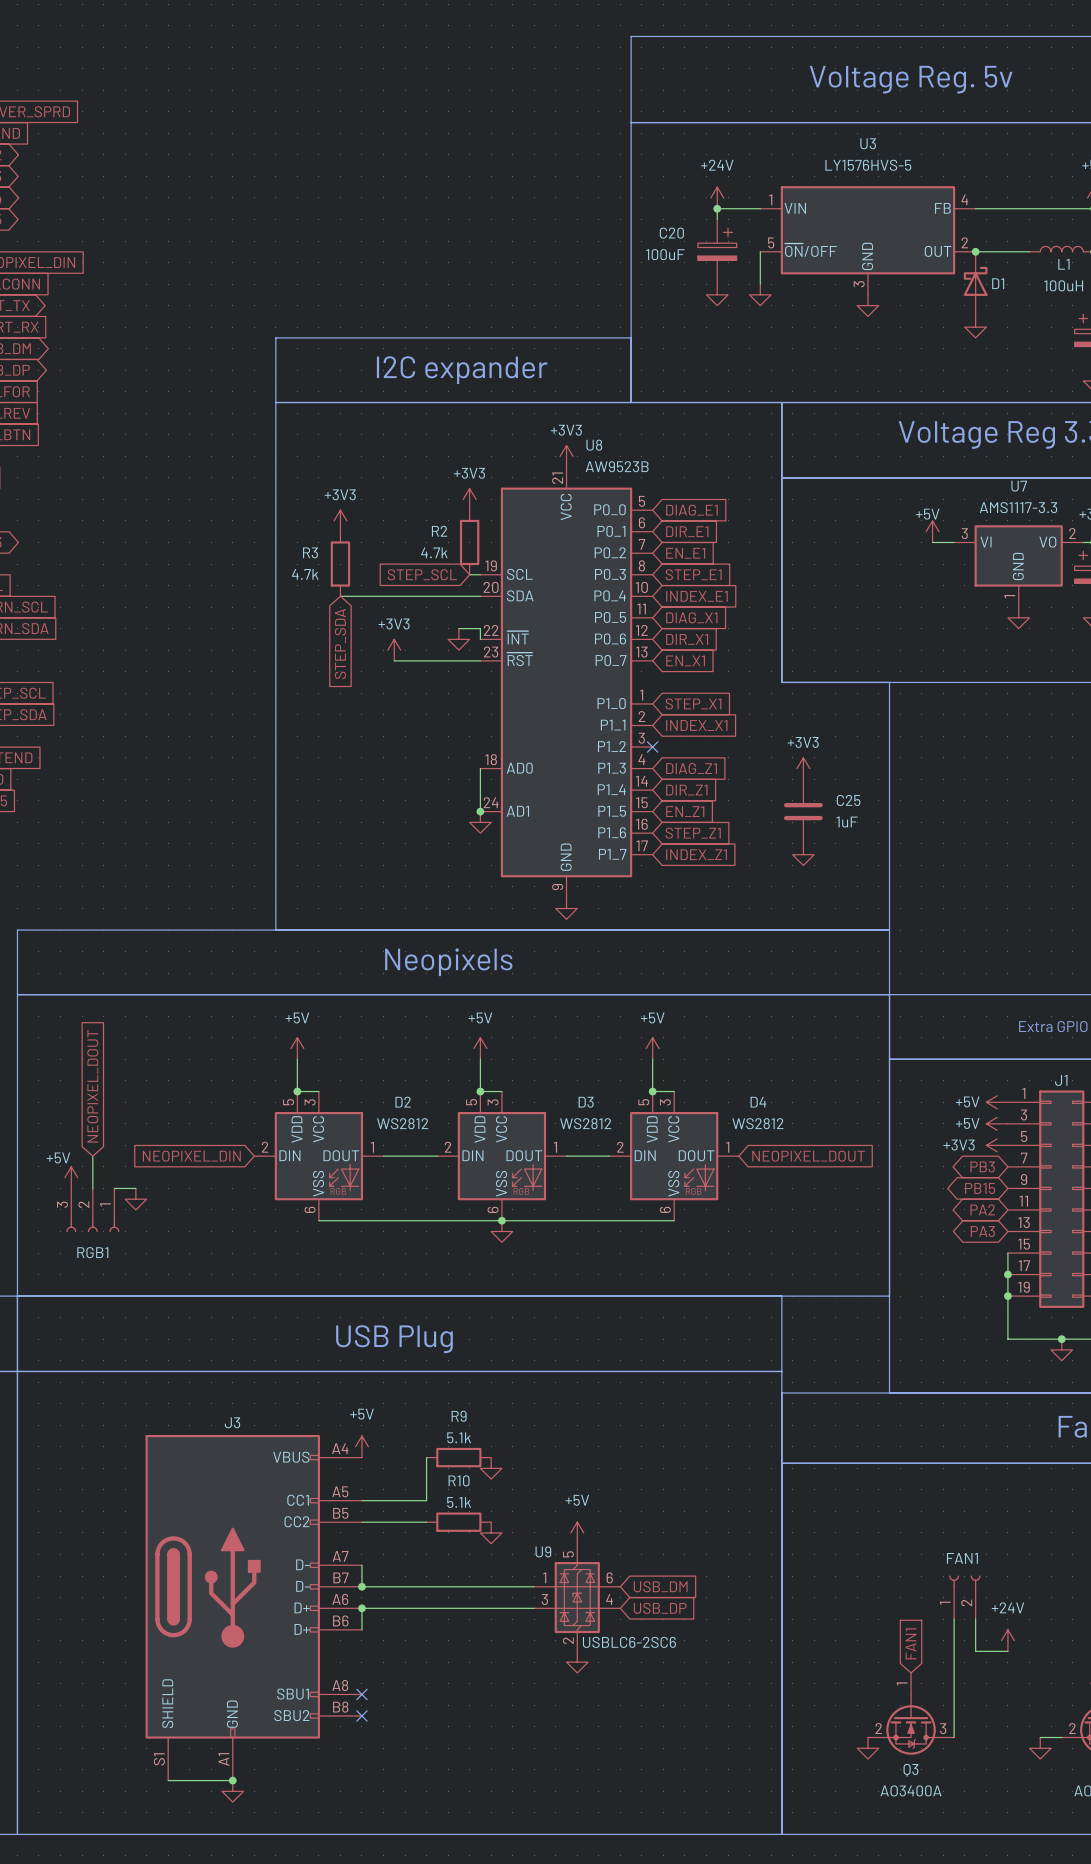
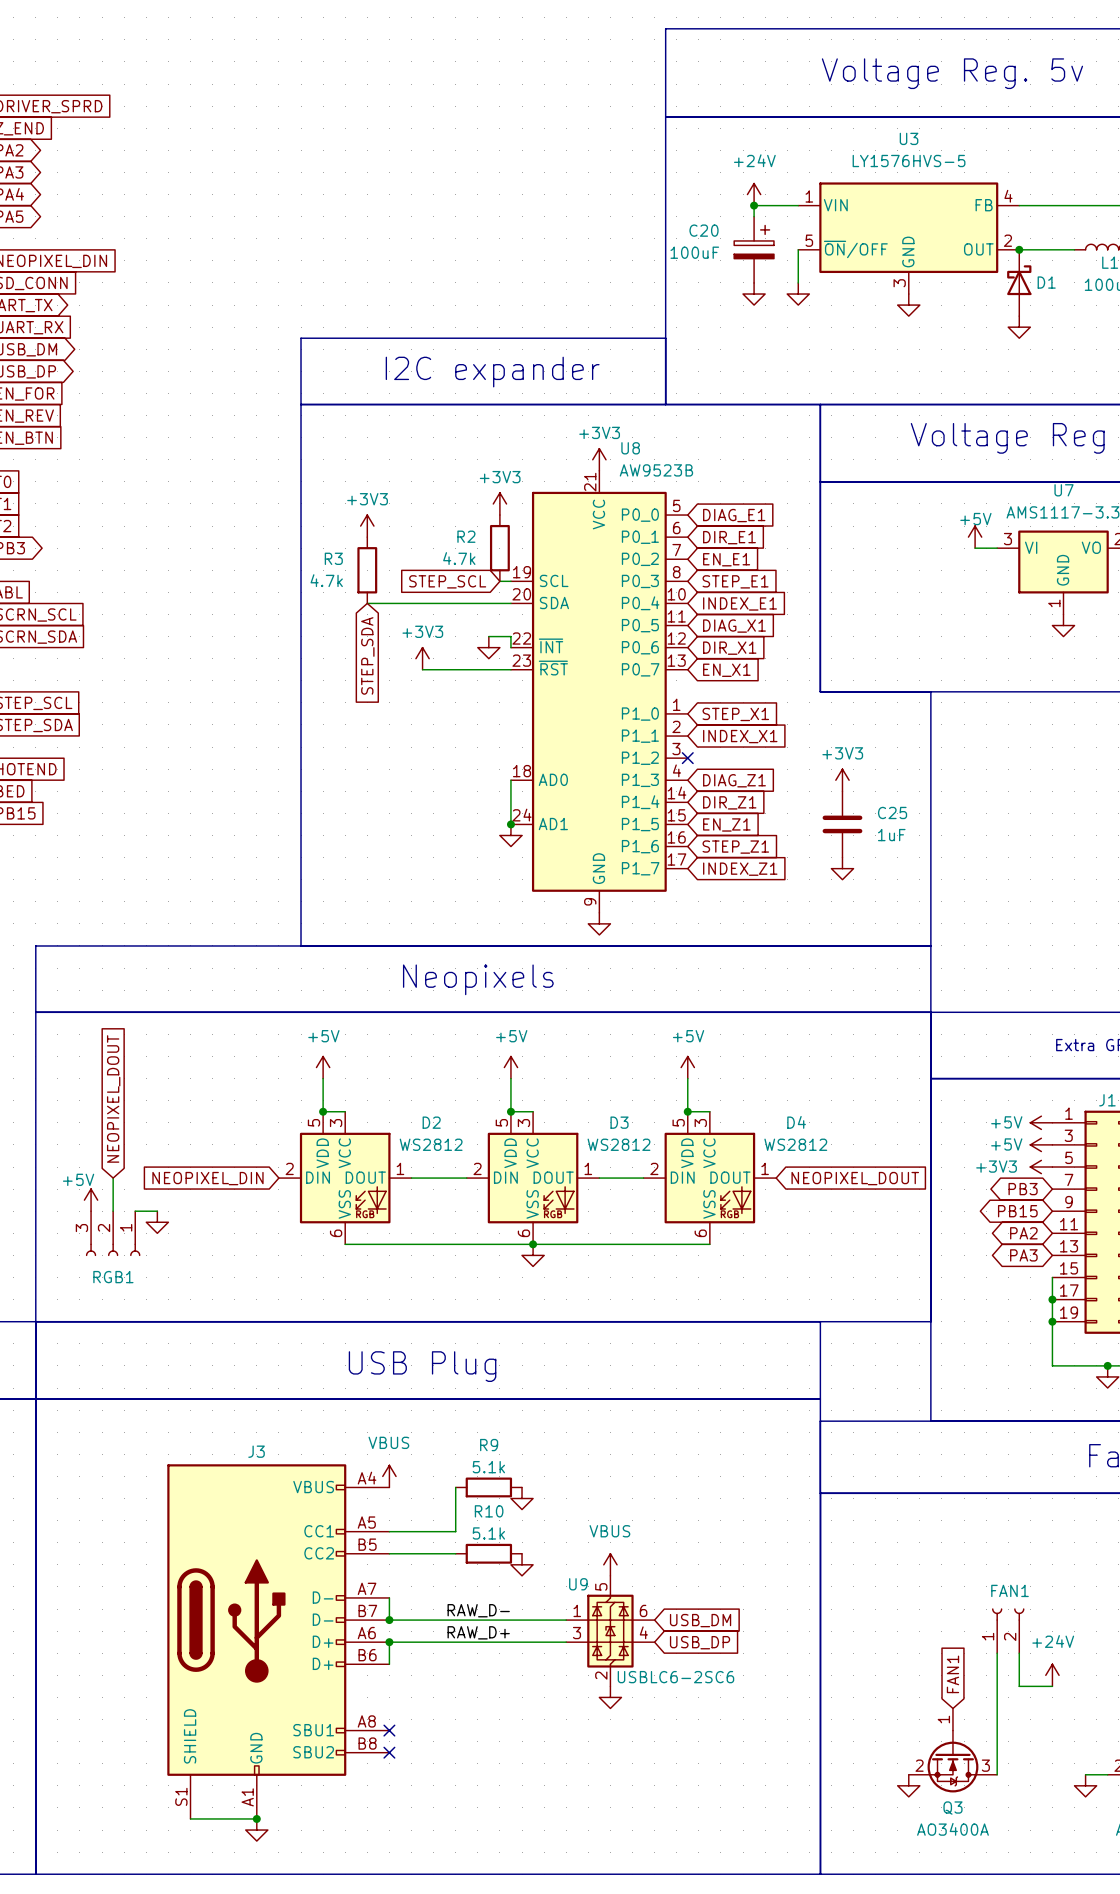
power symbol: +5V (361, 1446) -> VBUS (389, 1476)
power symbol: +5V (577, 1532) -> VBUS (610, 1564)
label: none -> RAW_D- (478, 1610)
label: none -> RAW_D+ (478, 1632)

